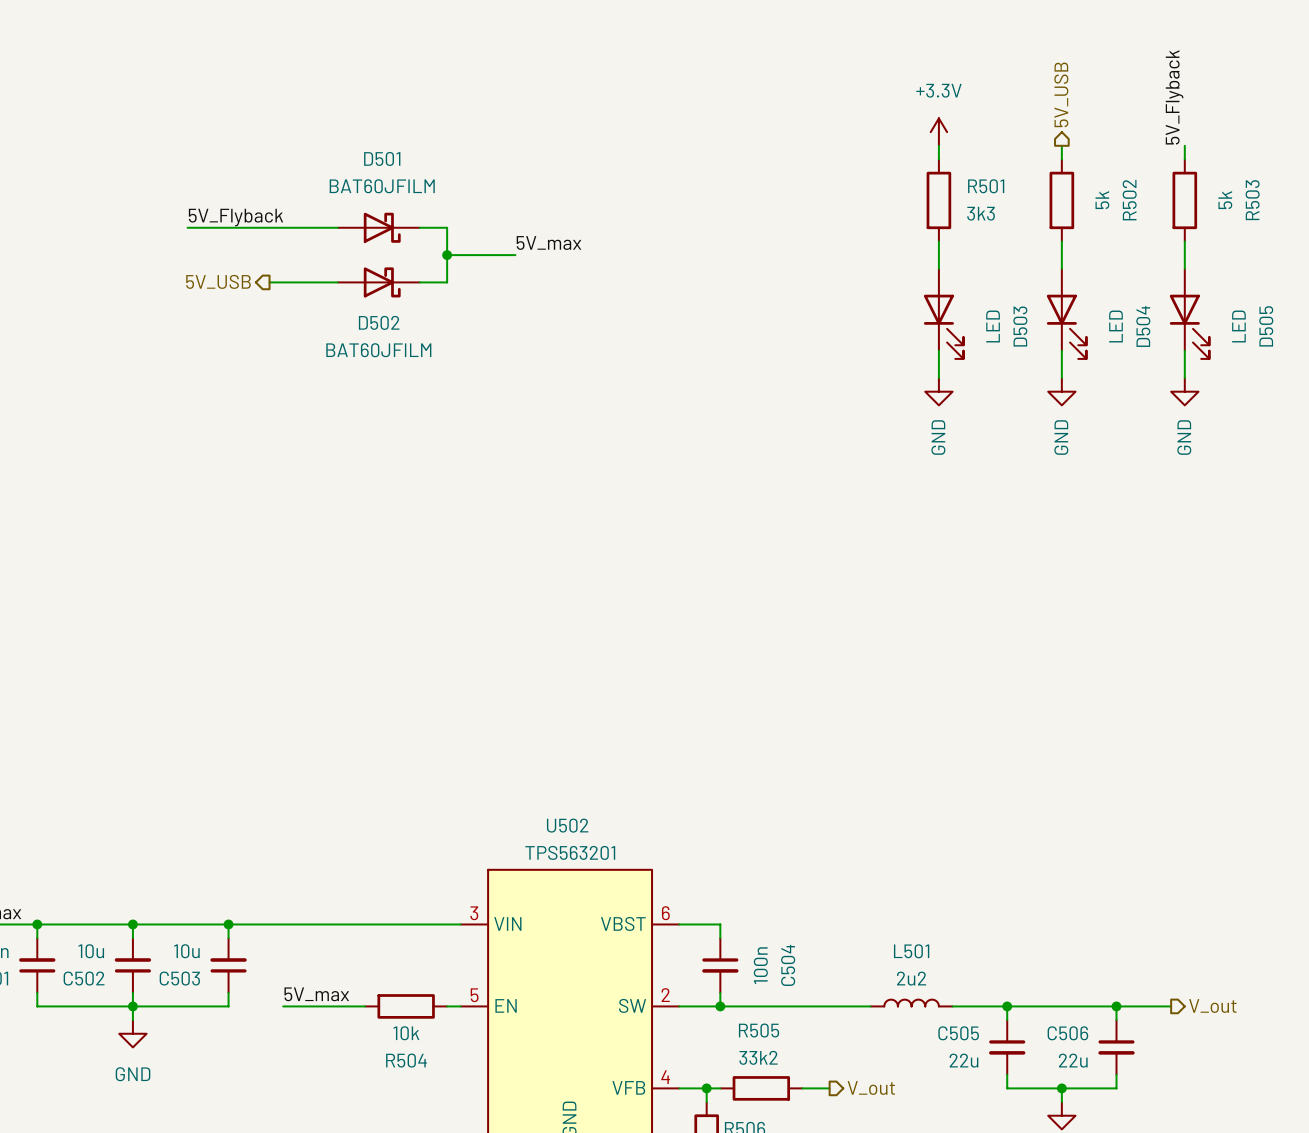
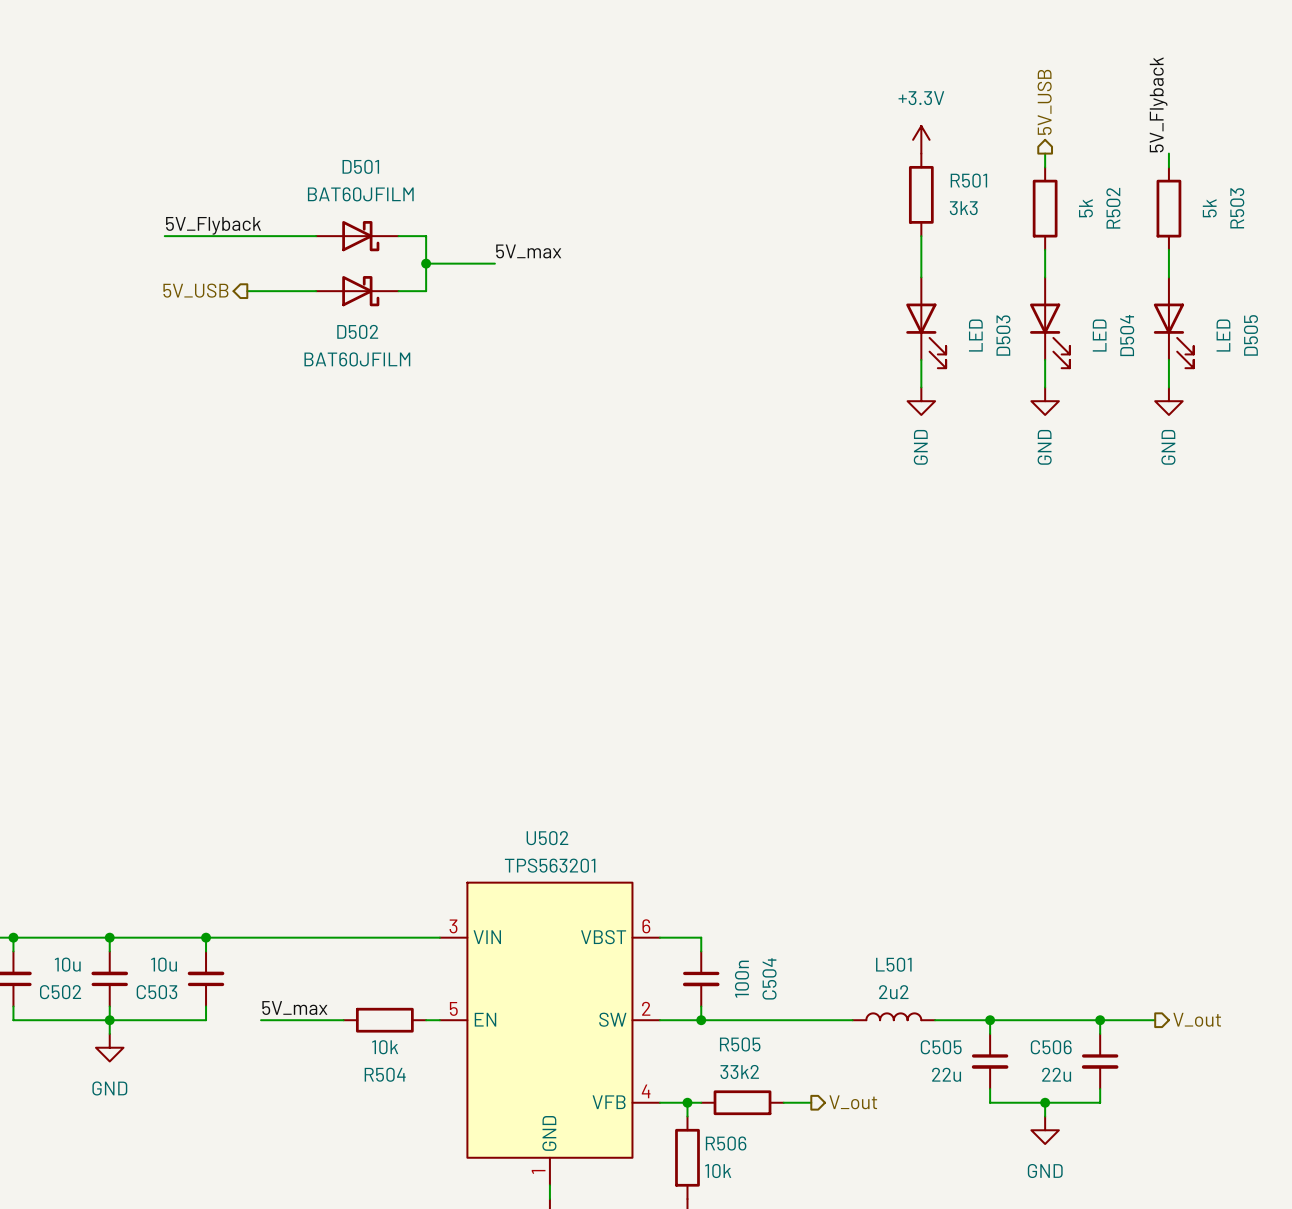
R501 position: (938, 200) -> (921, 194)

